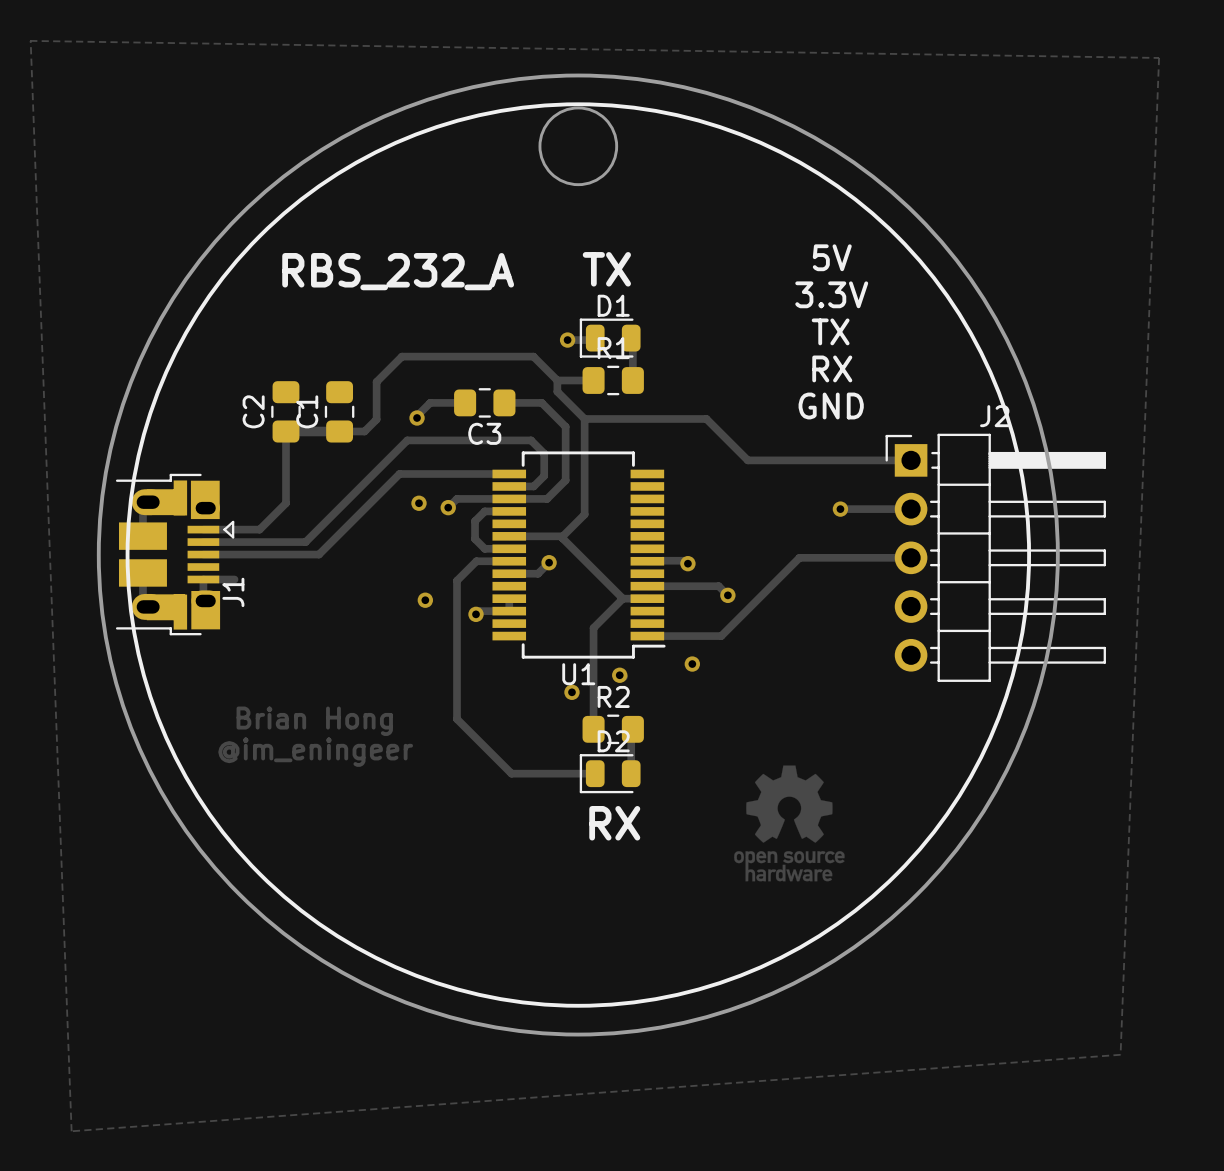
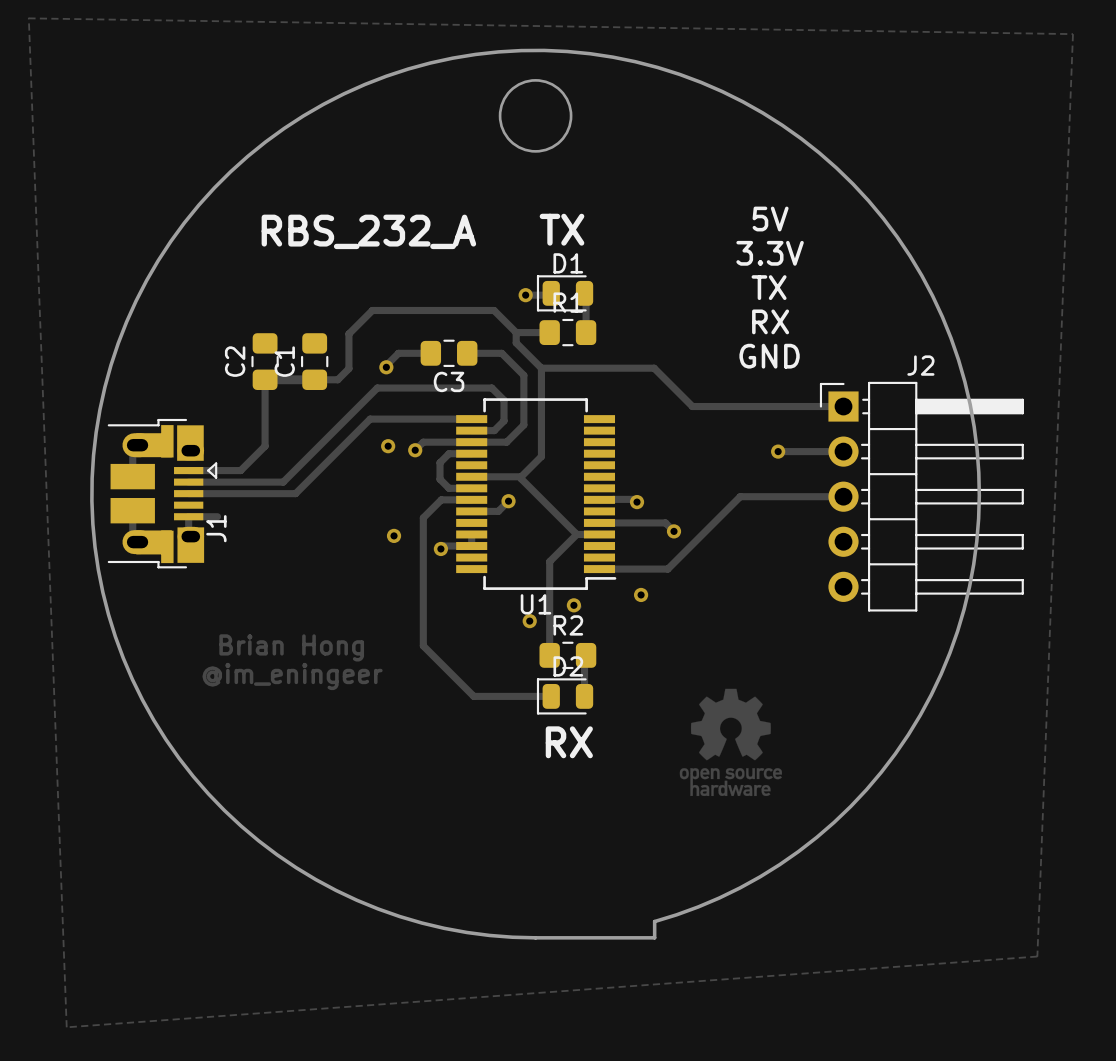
round board edge: [96, 73, 1060, 1037] -> none
drawing: [125, 102, 1032, 1008] -> none
board edge: none -> (654, 921) (654, 937) (535, 937) (489, 935) (444, 928) (399, 916) (356, 900) (315, 879) (277, 854) (241, 826) (193, 776) (165, 739) (142, 699) (123, 658) (108, 614) (98, 569) (92, 524) (92, 478) (96, 432) (111, 365) (126, 321) (146, 280) (170, 241) (198, 205) (230, 171) (265, 141) (323, 104) (364, 84) (408, 69) (452, 58) (498, 51) (544, 50) (590, 53) (657, 67) (701, 82) (742, 101) (782, 125) (819, 152) (852, 183) (883, 218) (910, 255) (932, 295) (958, 359) (970, 404) (977, 449) (979, 495) (976, 541) (969, 586) (957, 631) (941, 674) (920, 715) (895, 753) (866, 789) (834, 822) (798, 851) (740, 887) (698, 906) (654, 921)

